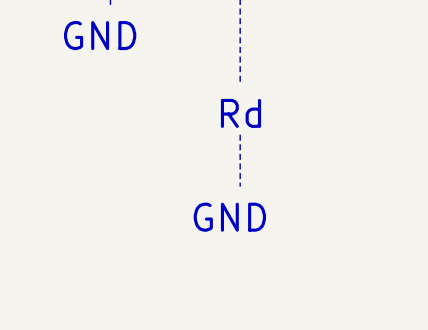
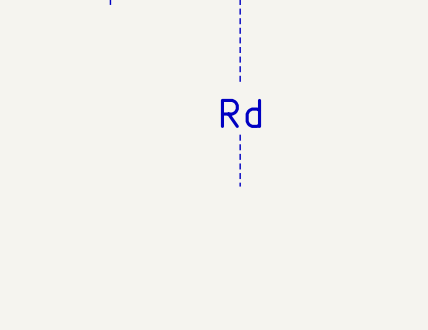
text: GND (100, 35) -> none
text: GND (229, 217) -> none

